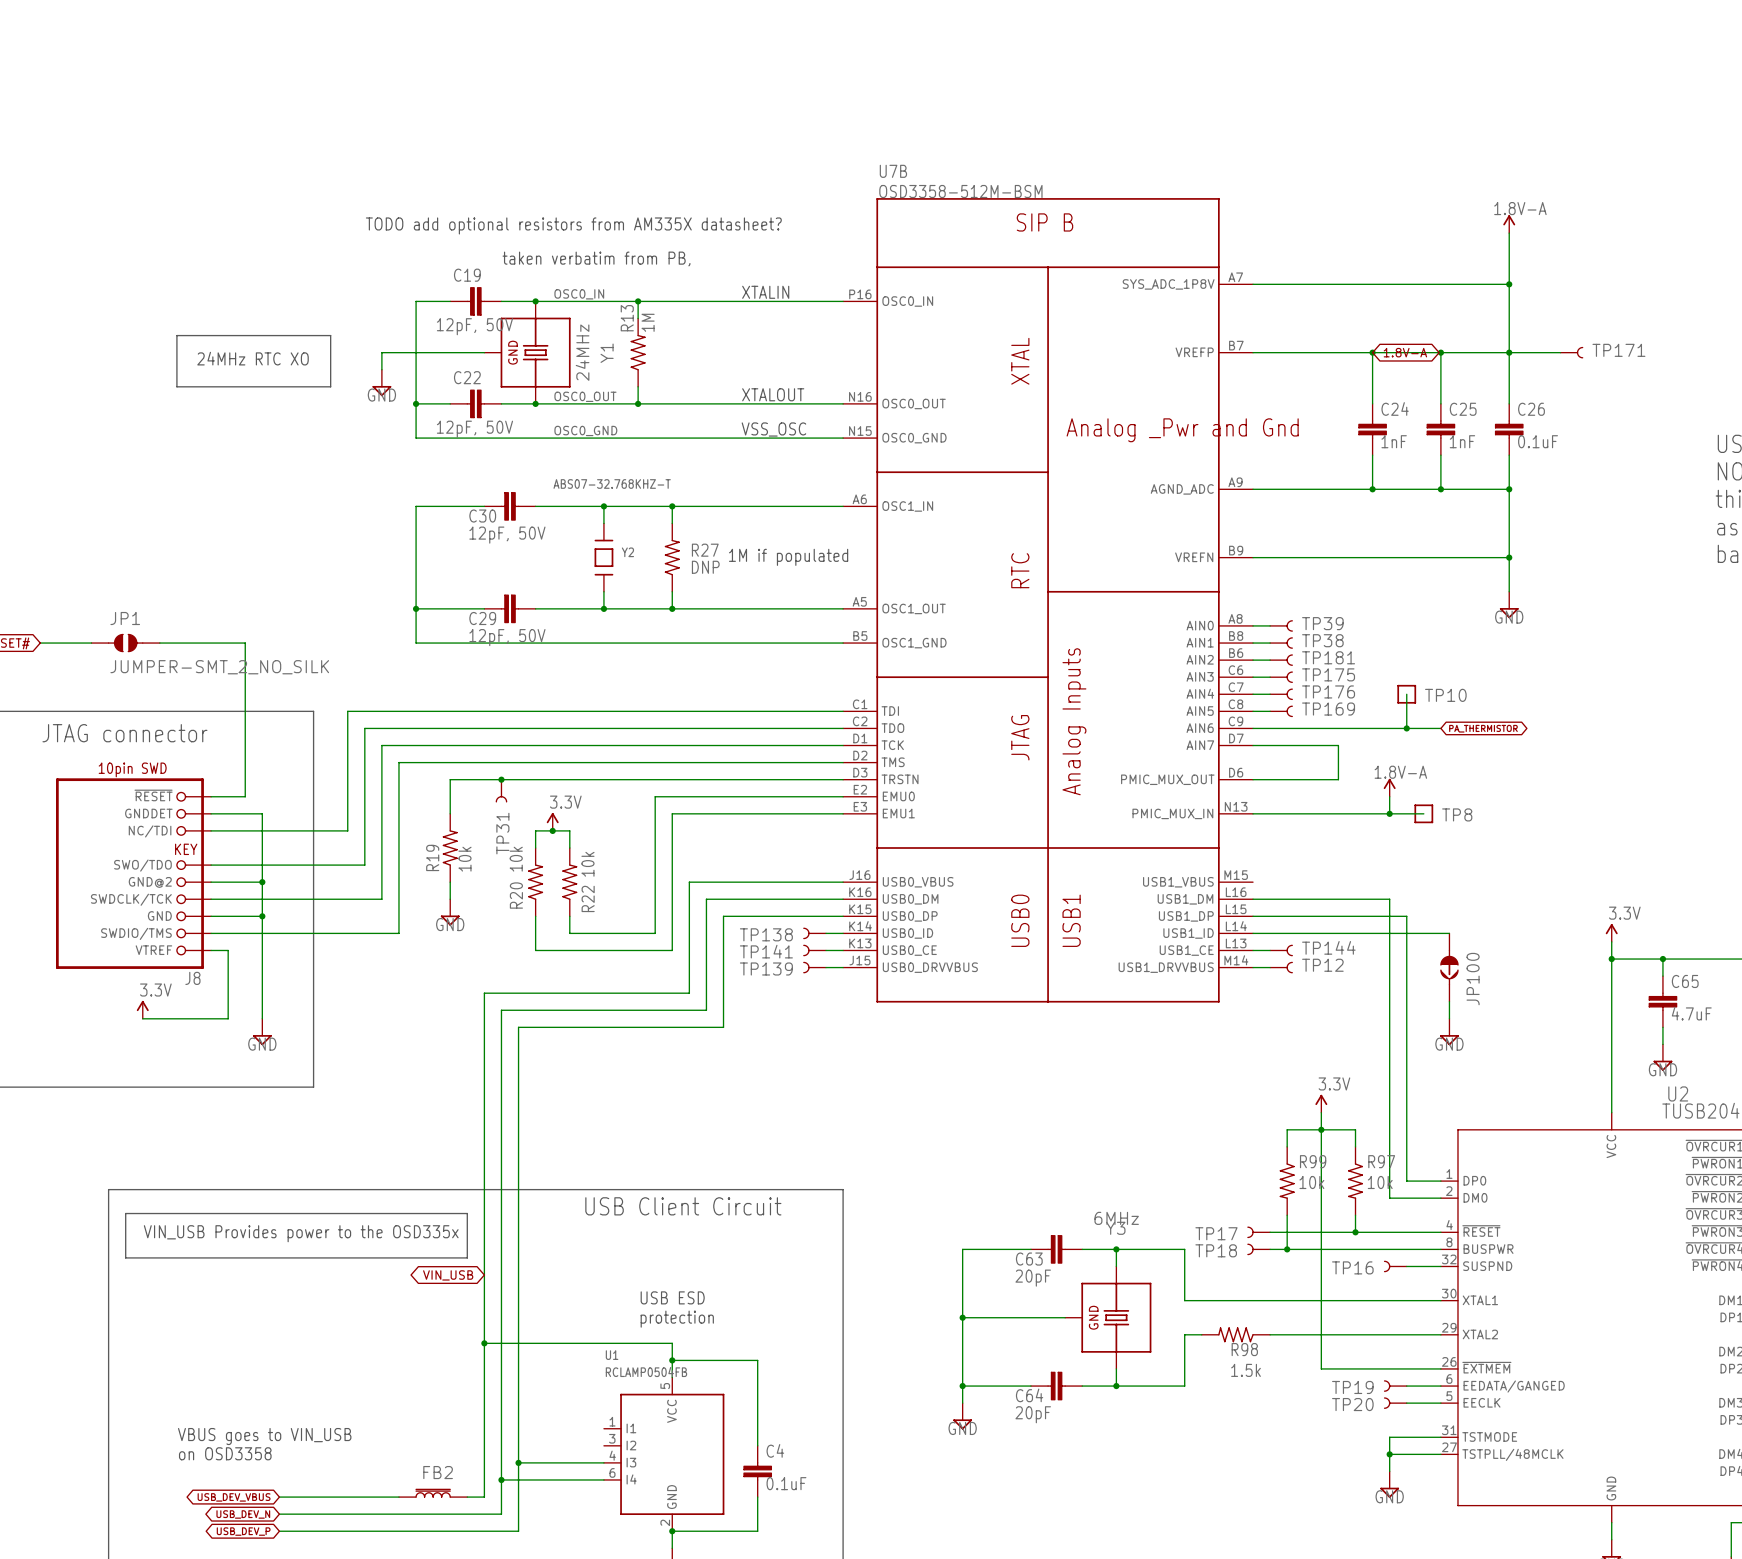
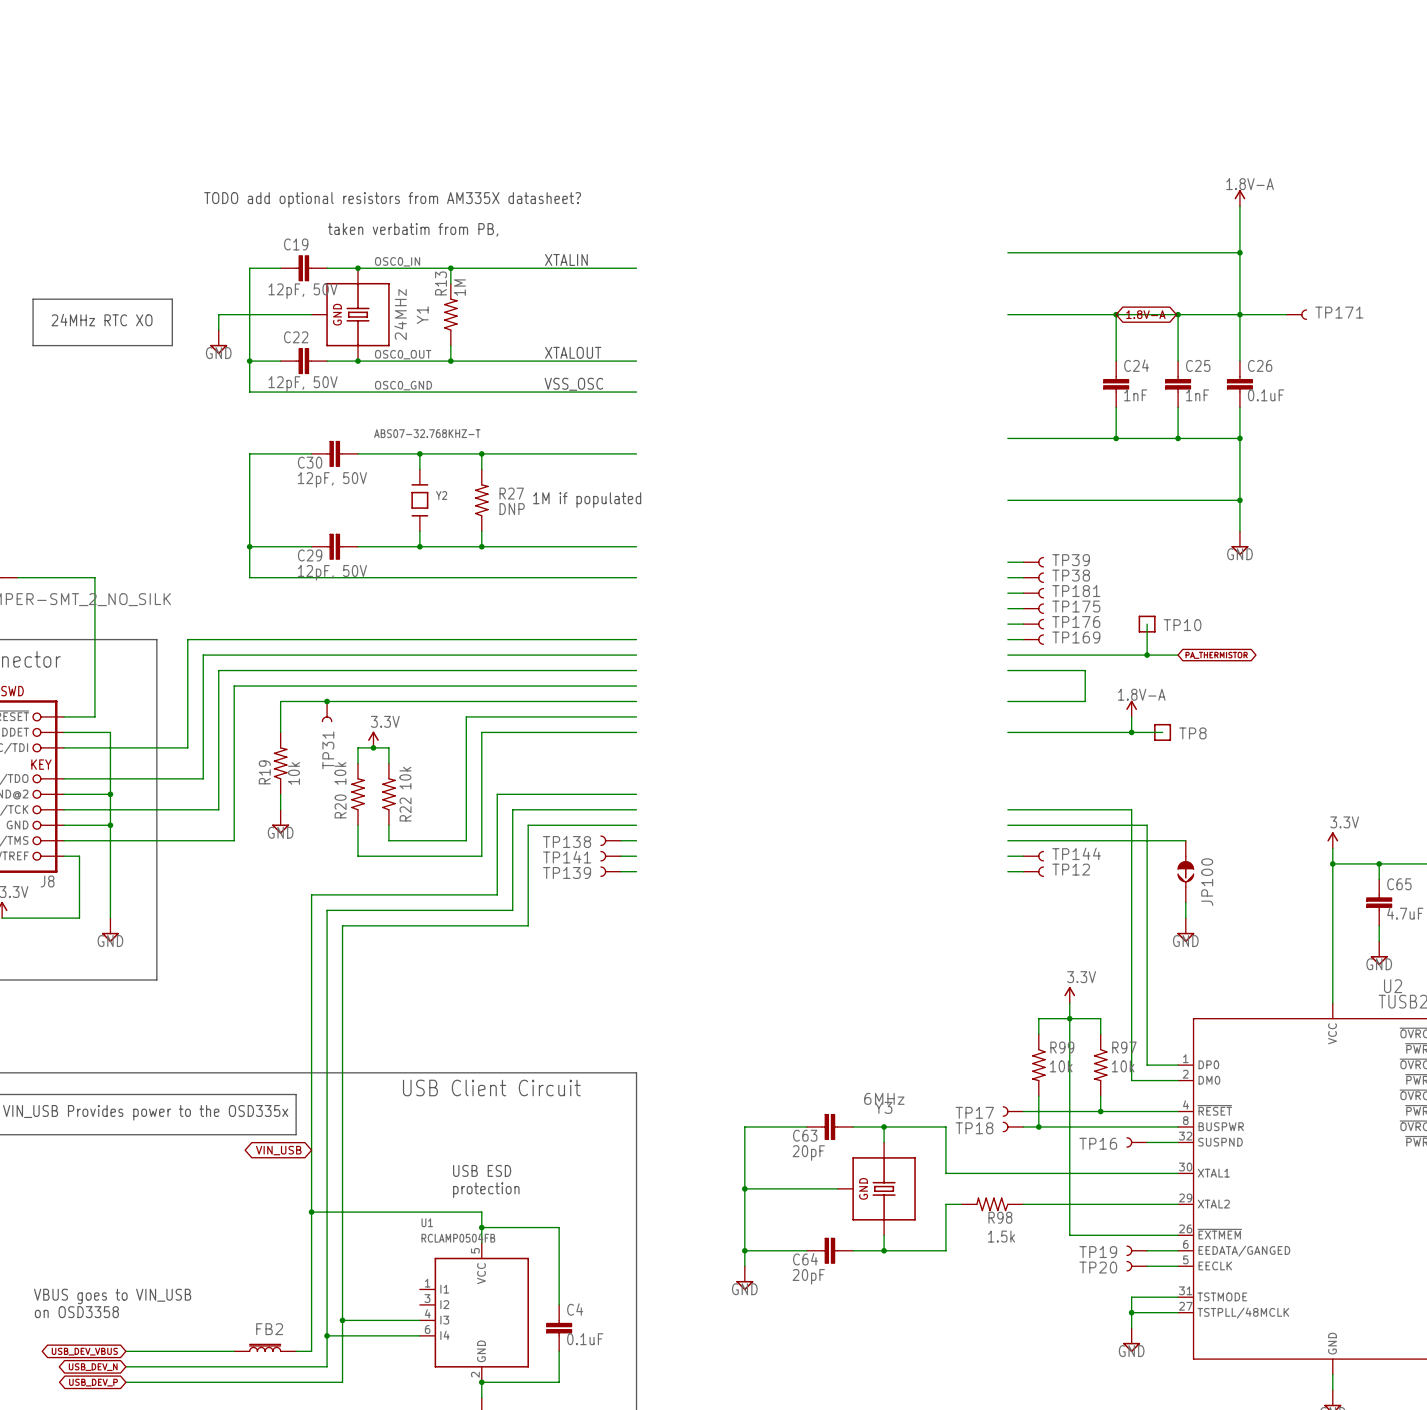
U7B: OSD3358-512M-BSM (1048, 600) -> none

